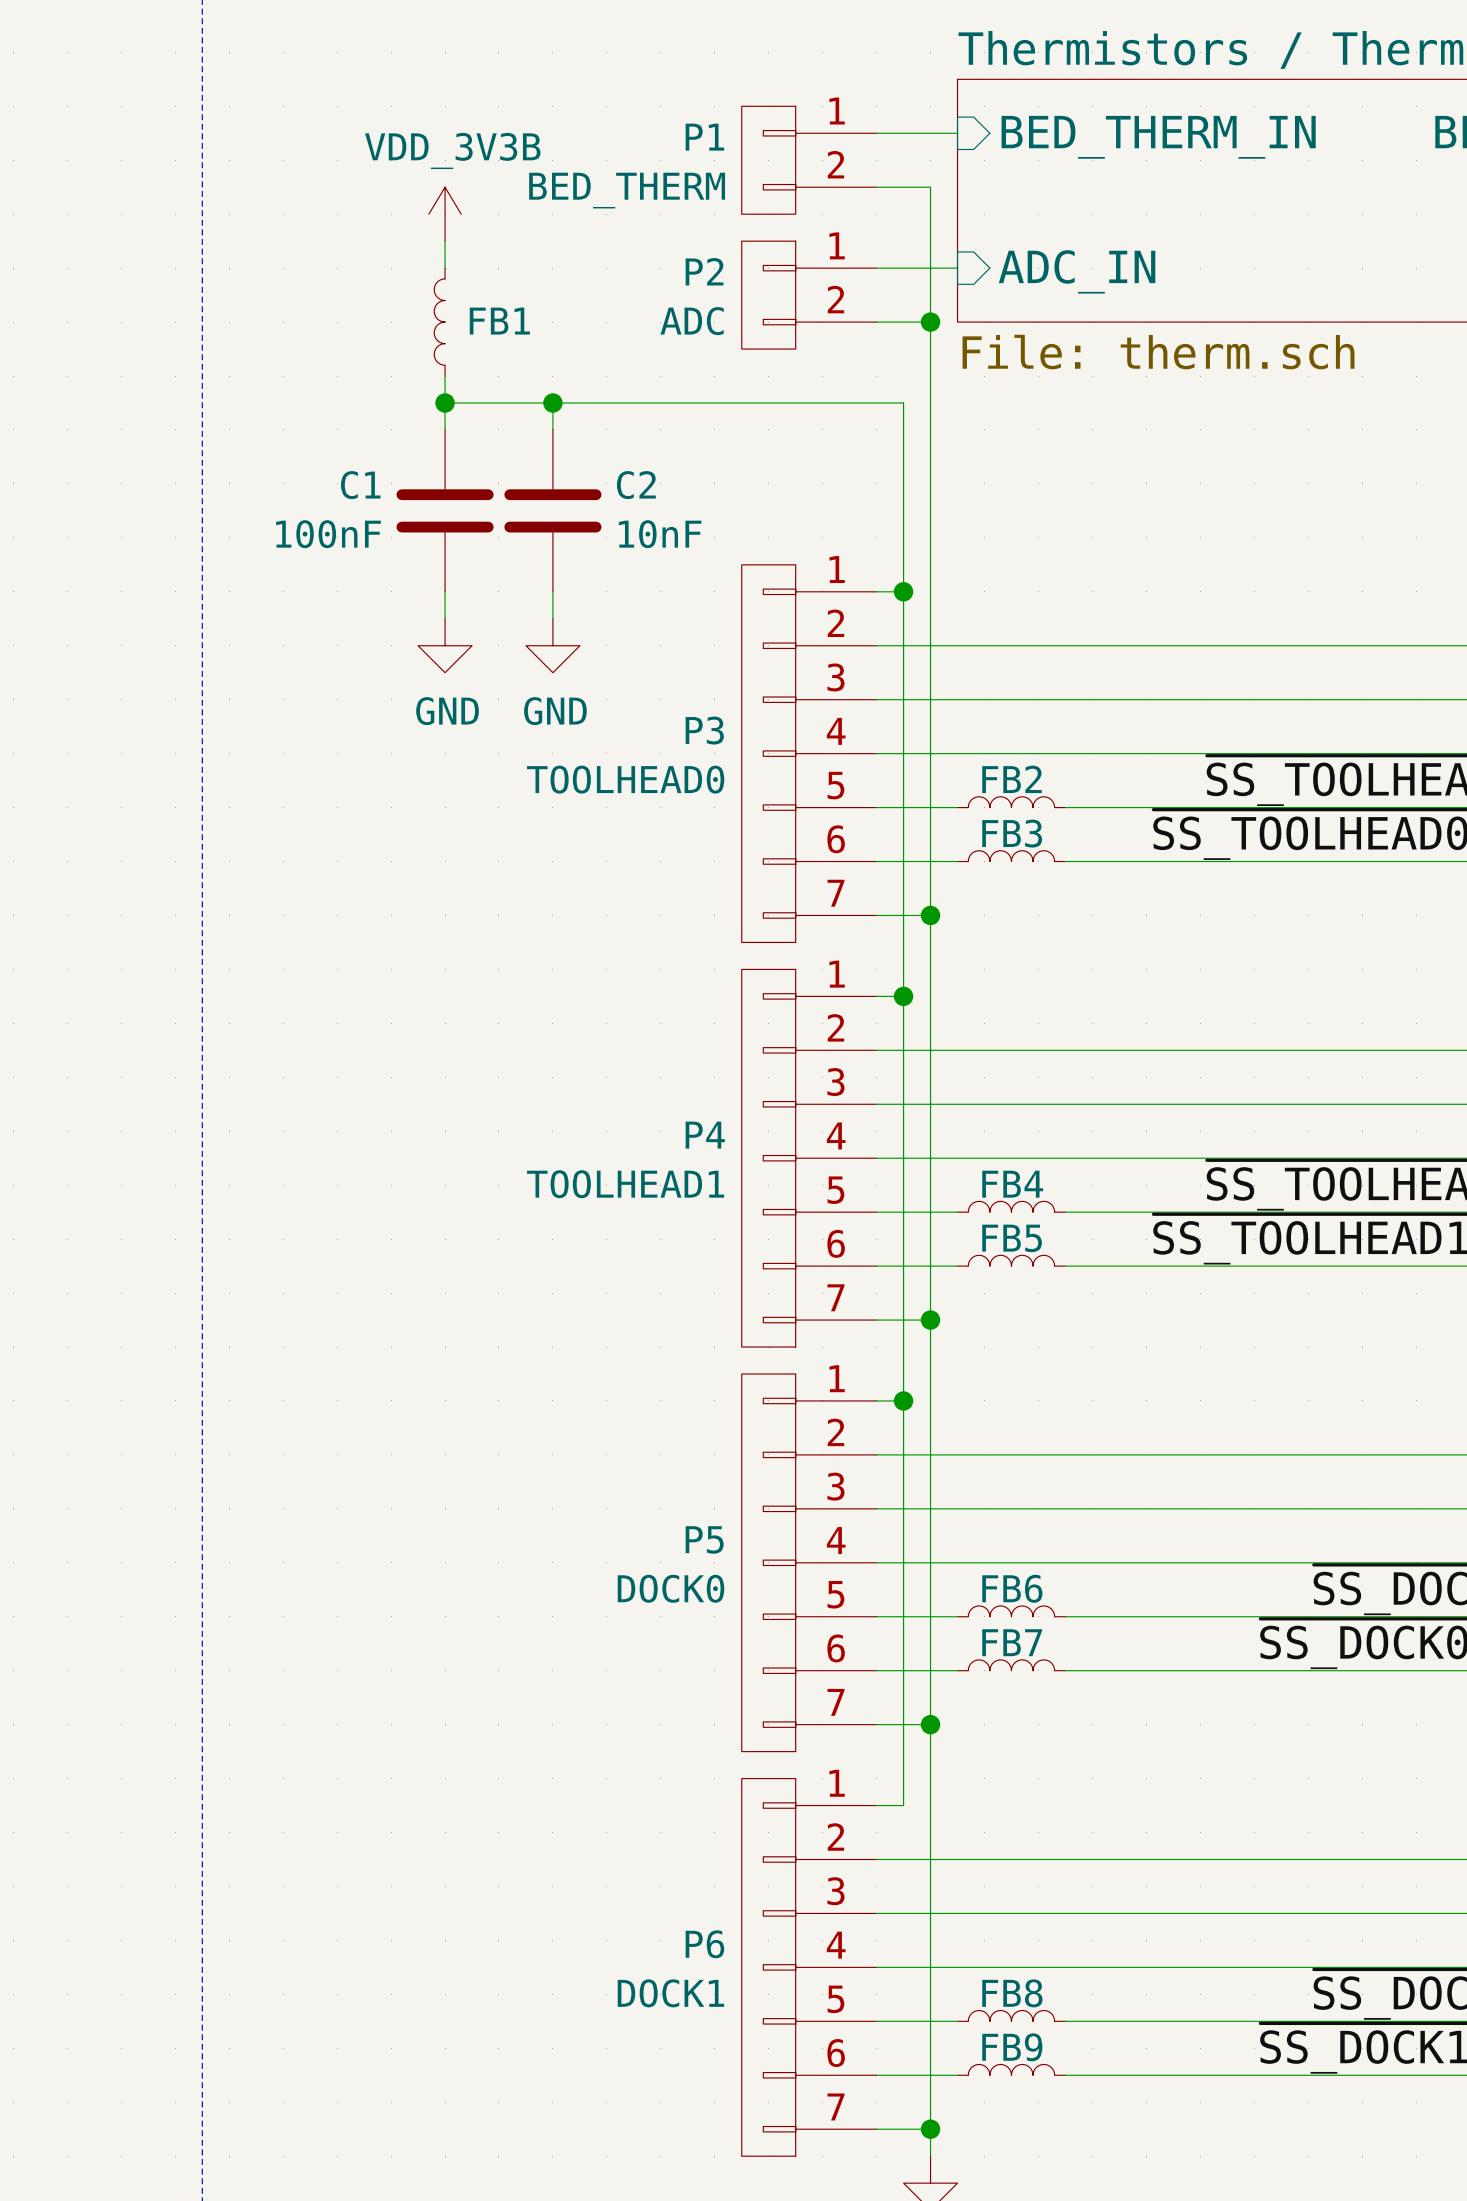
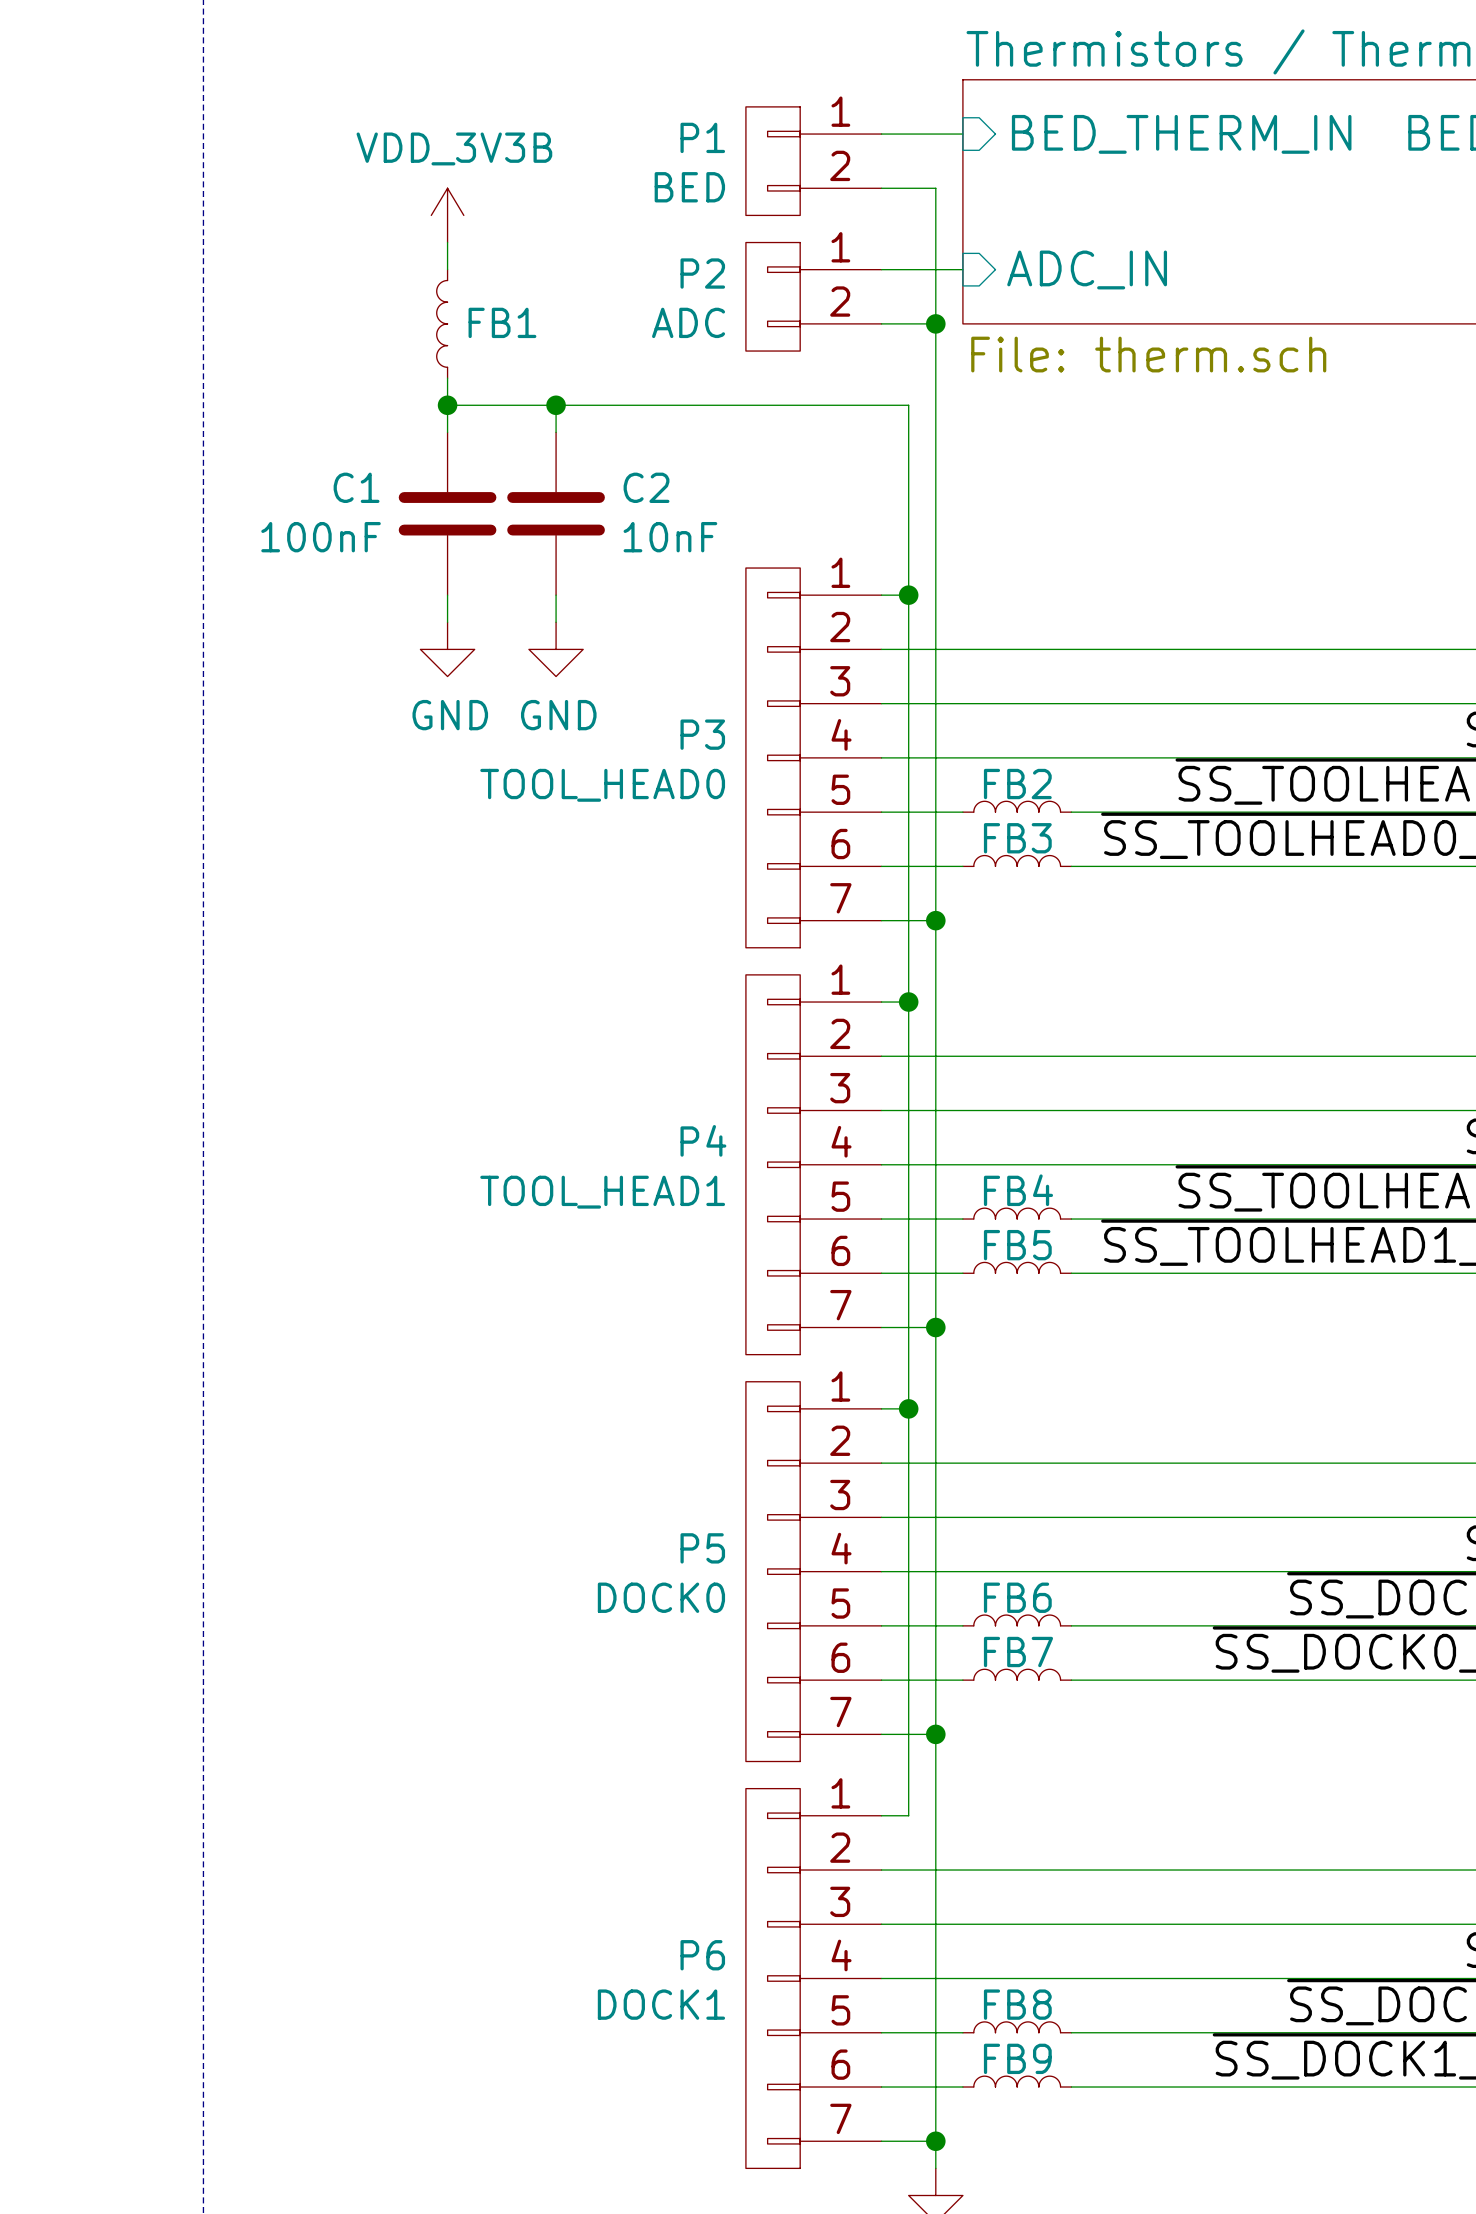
P1 value: BED_THERM (627, 190) -> BED (689, 187)
P3 value: TOOLHEAD0 (625, 779) -> TOOL_HEAD0 (602, 785)
P4 value: TOOLHEAD1 (625, 1184) -> TOOL_HEAD1 (602, 1192)

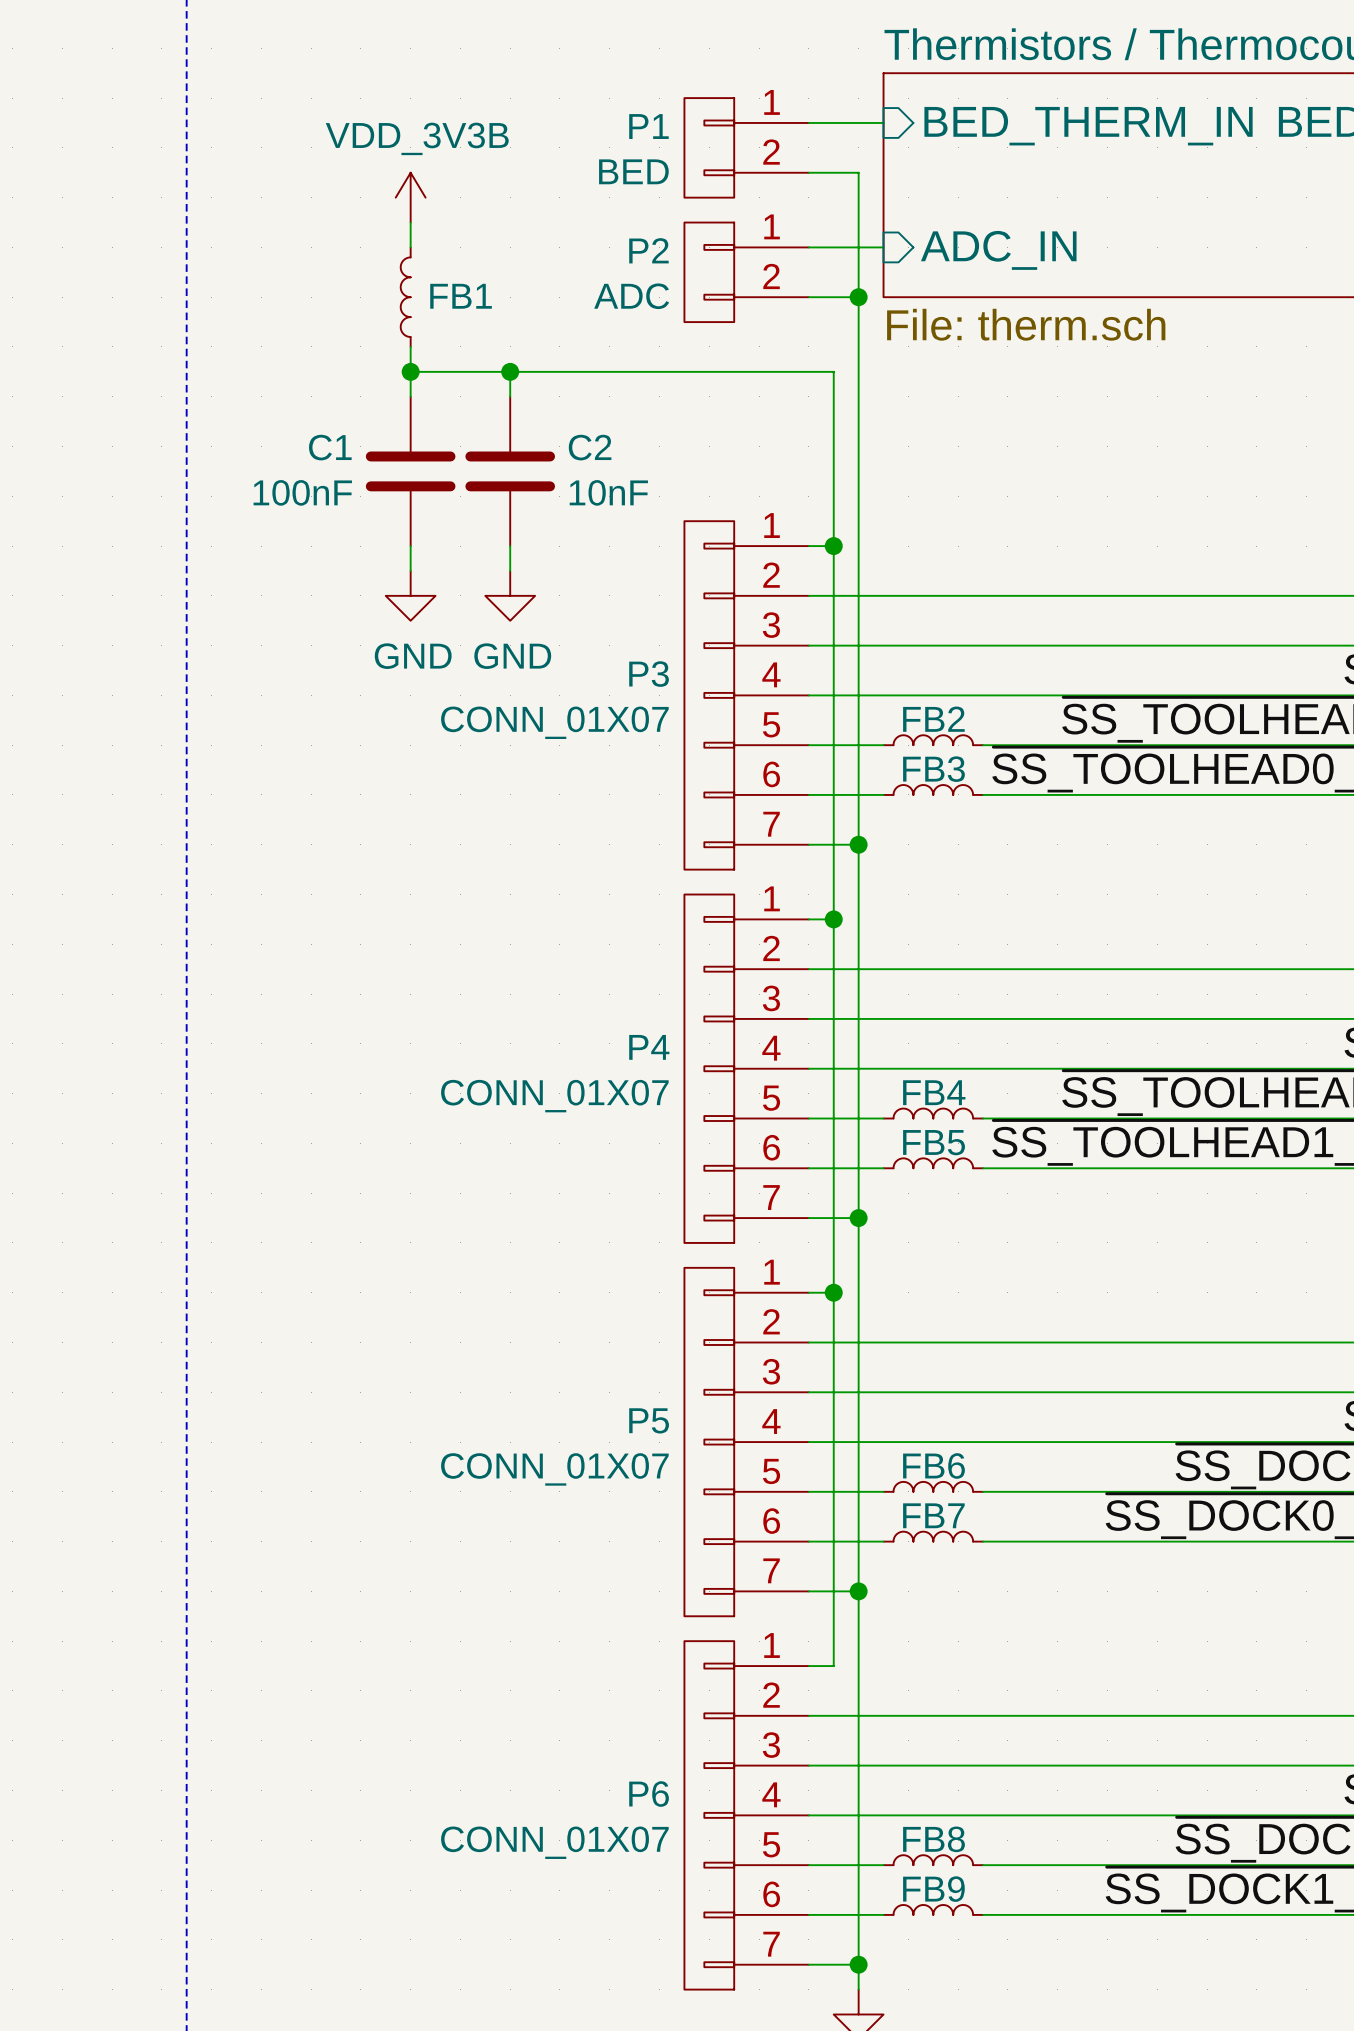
P3 value: TOOL_HEAD0 (602, 785) -> CONN_01X07 (554, 722)
P4 value: TOOL_HEAD1 (602, 1192) -> CONN_01X07 (554, 1096)
P5 value: DOCK0 (661, 1597) -> CONN_01X07 (554, 1469)
P6 value: DOCK1 (661, 2004) -> CONN_01X07 (554, 1842)

